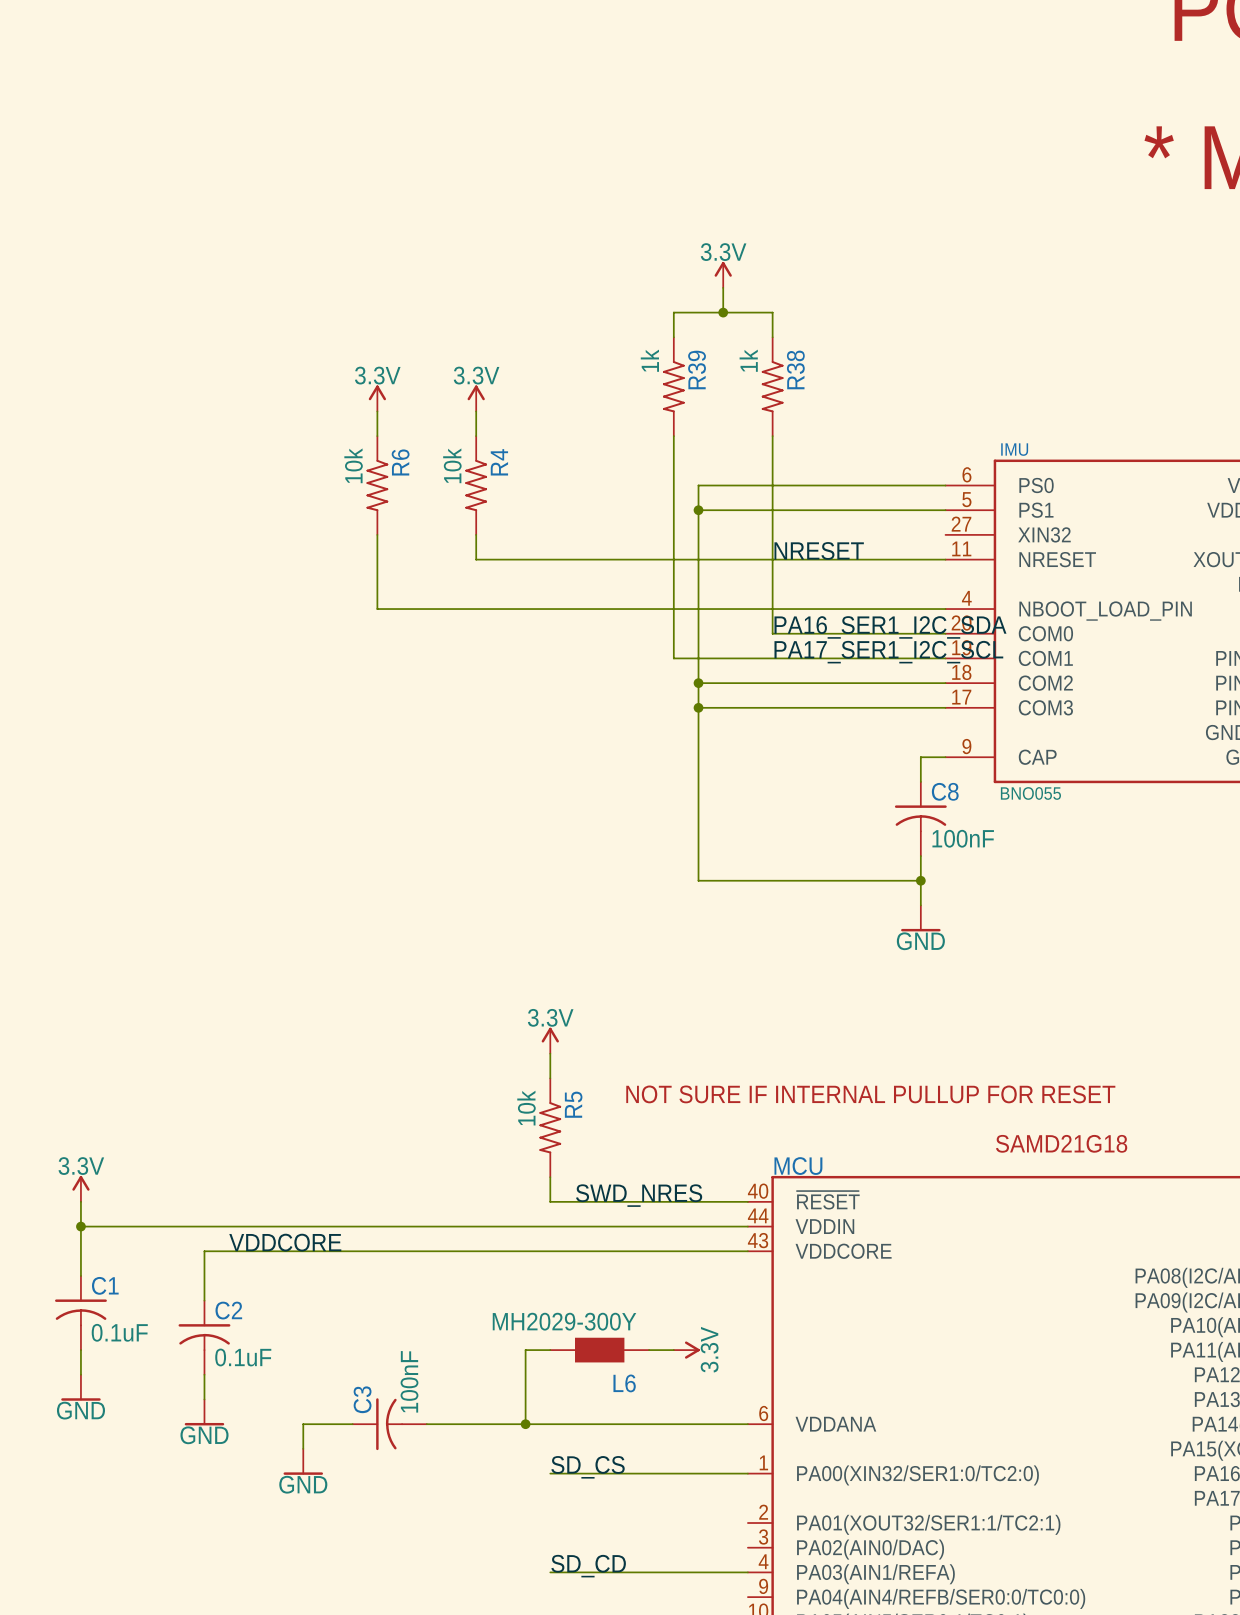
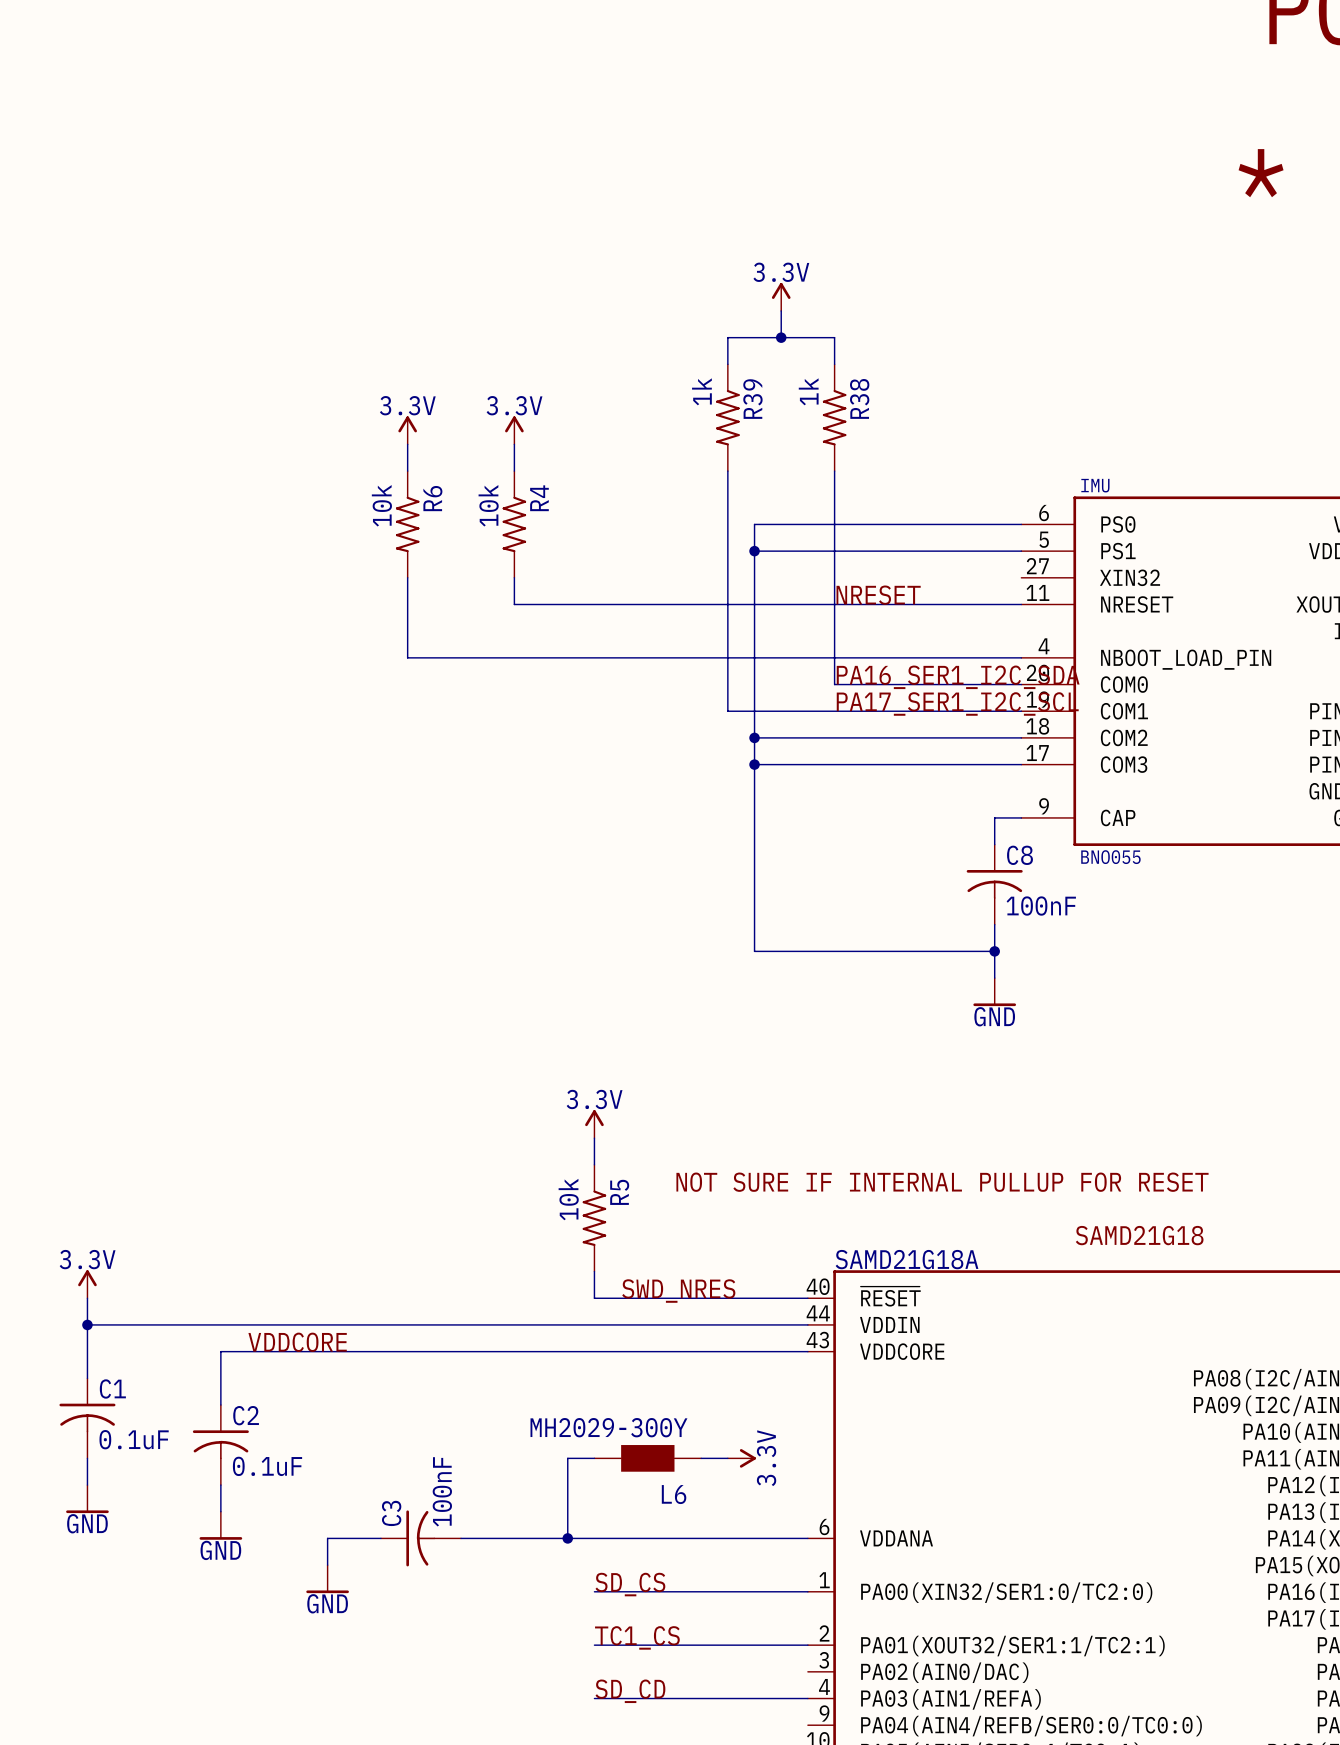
MCU name: MCU (798, 1166) -> SAMD21G18A (907, 1259)
label: none -> TC1_CS (637, 1637)
wire: none -> (594, 1645) (807, 1645)

